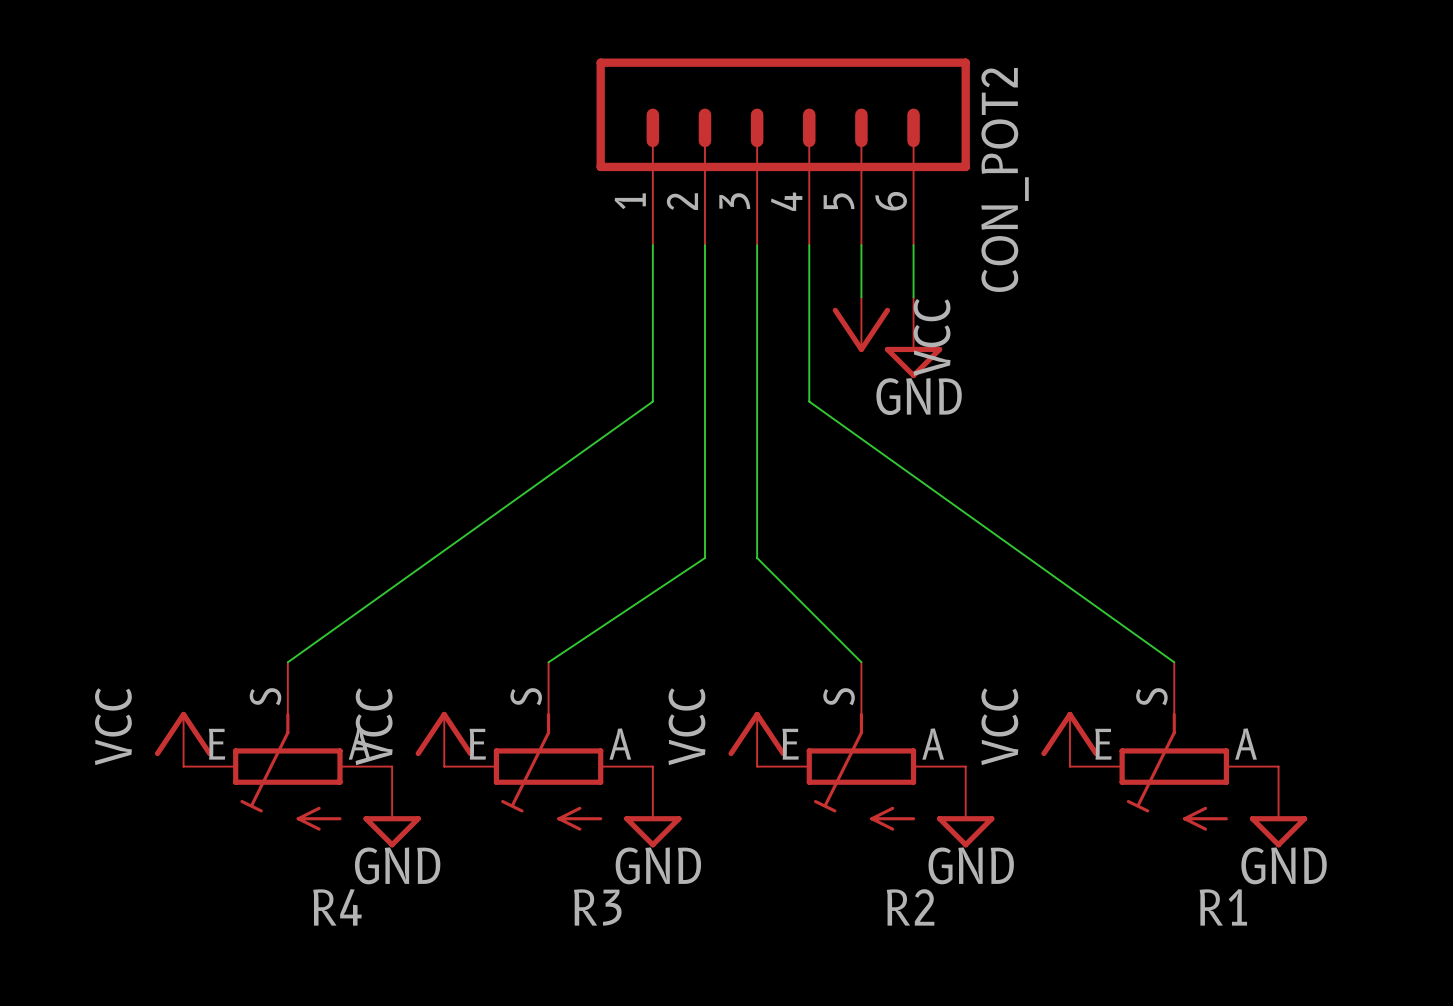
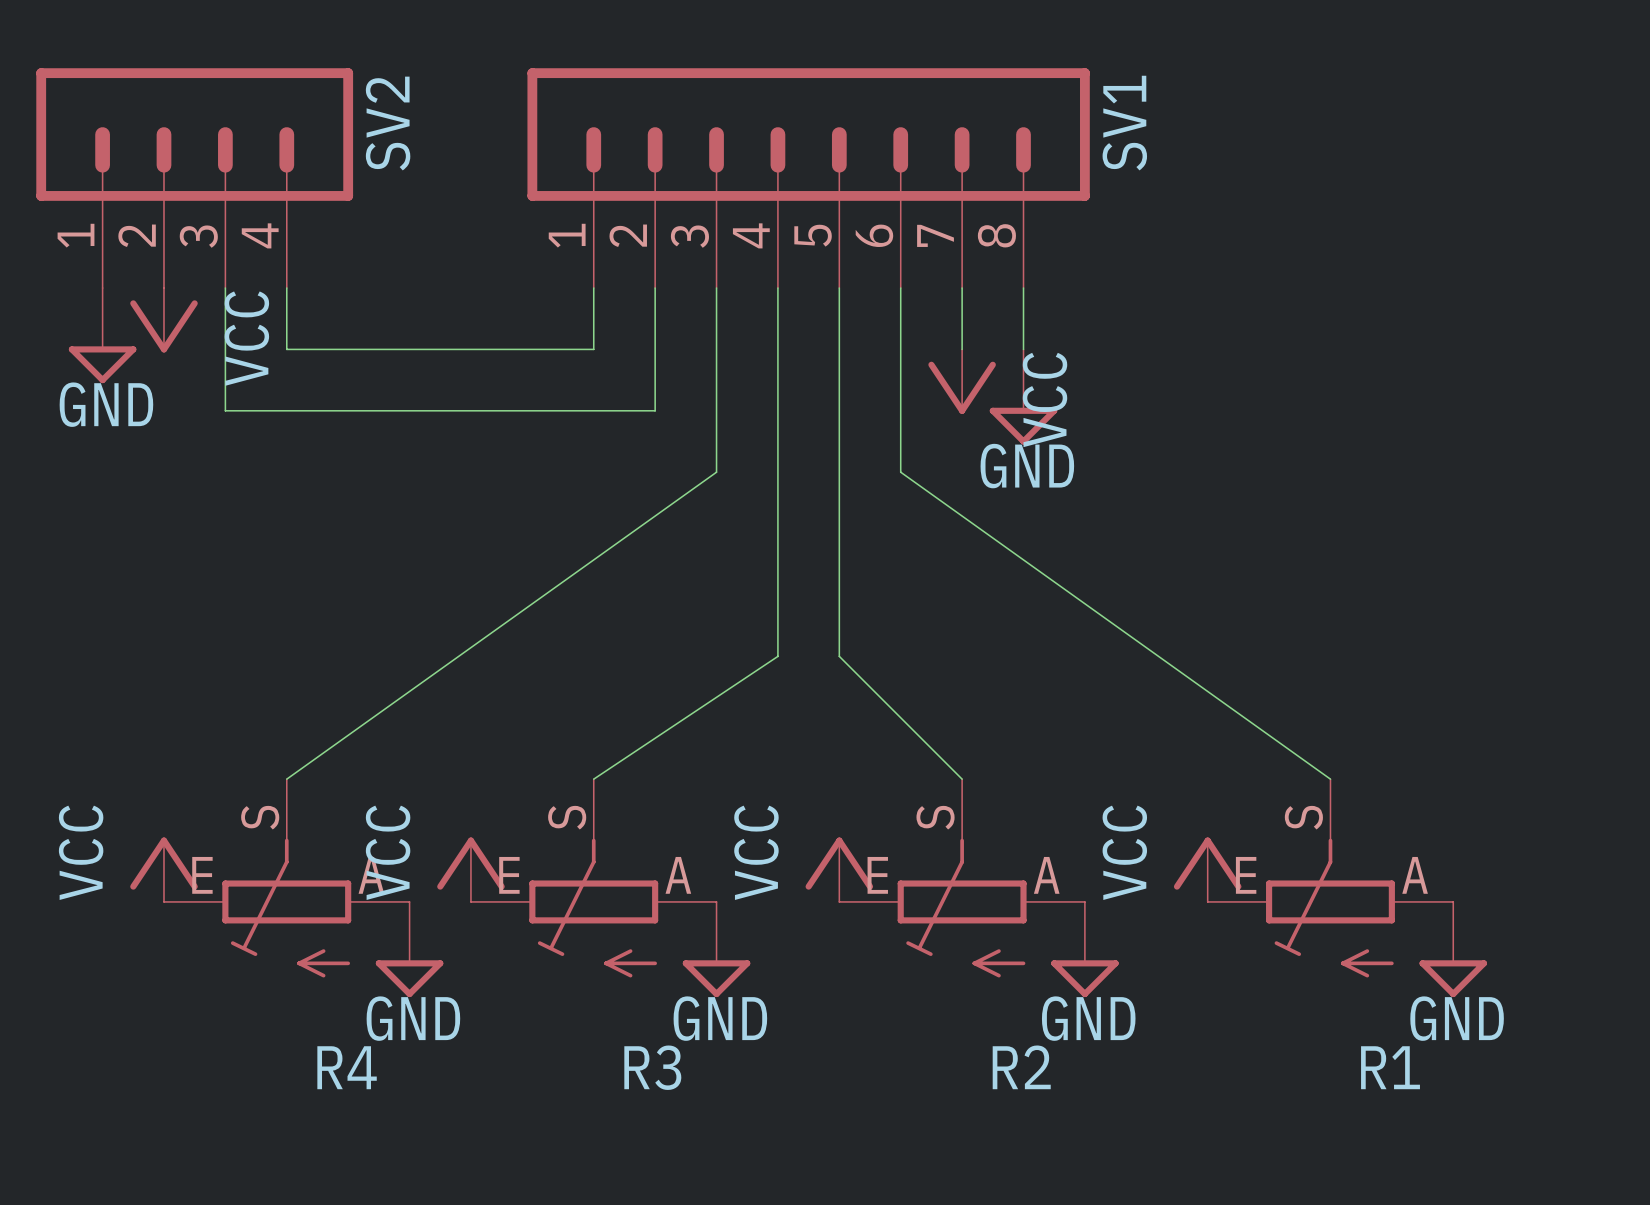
SV2: none -> (194, 178)
SV1: none -> (808, 178)
CON_POT2: (783, 151) -> none
wire: none -> (225, 288) (225, 410) (655, 410) (655, 288)
wire: none -> (286, 288) (286, 349) (593, 349) (593, 288)
power symbol: none -> VCC (163, 320)
power symbol: none -> GND (102, 335)

